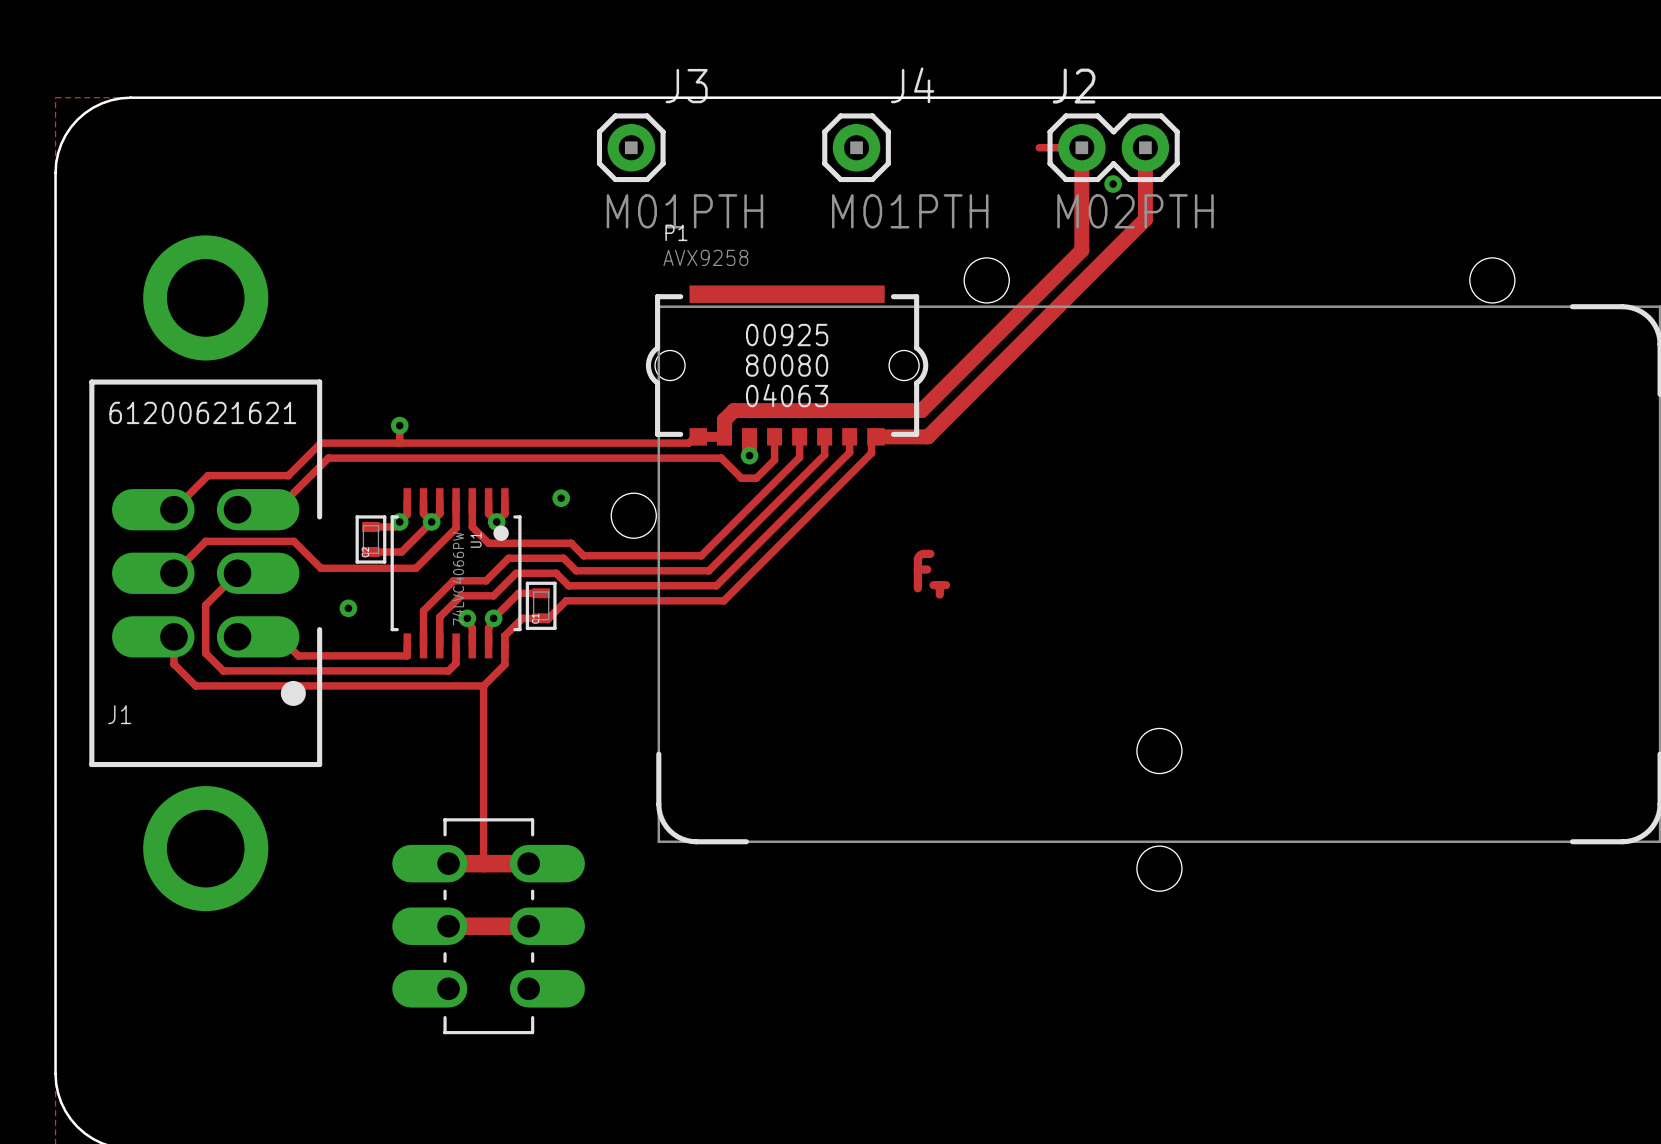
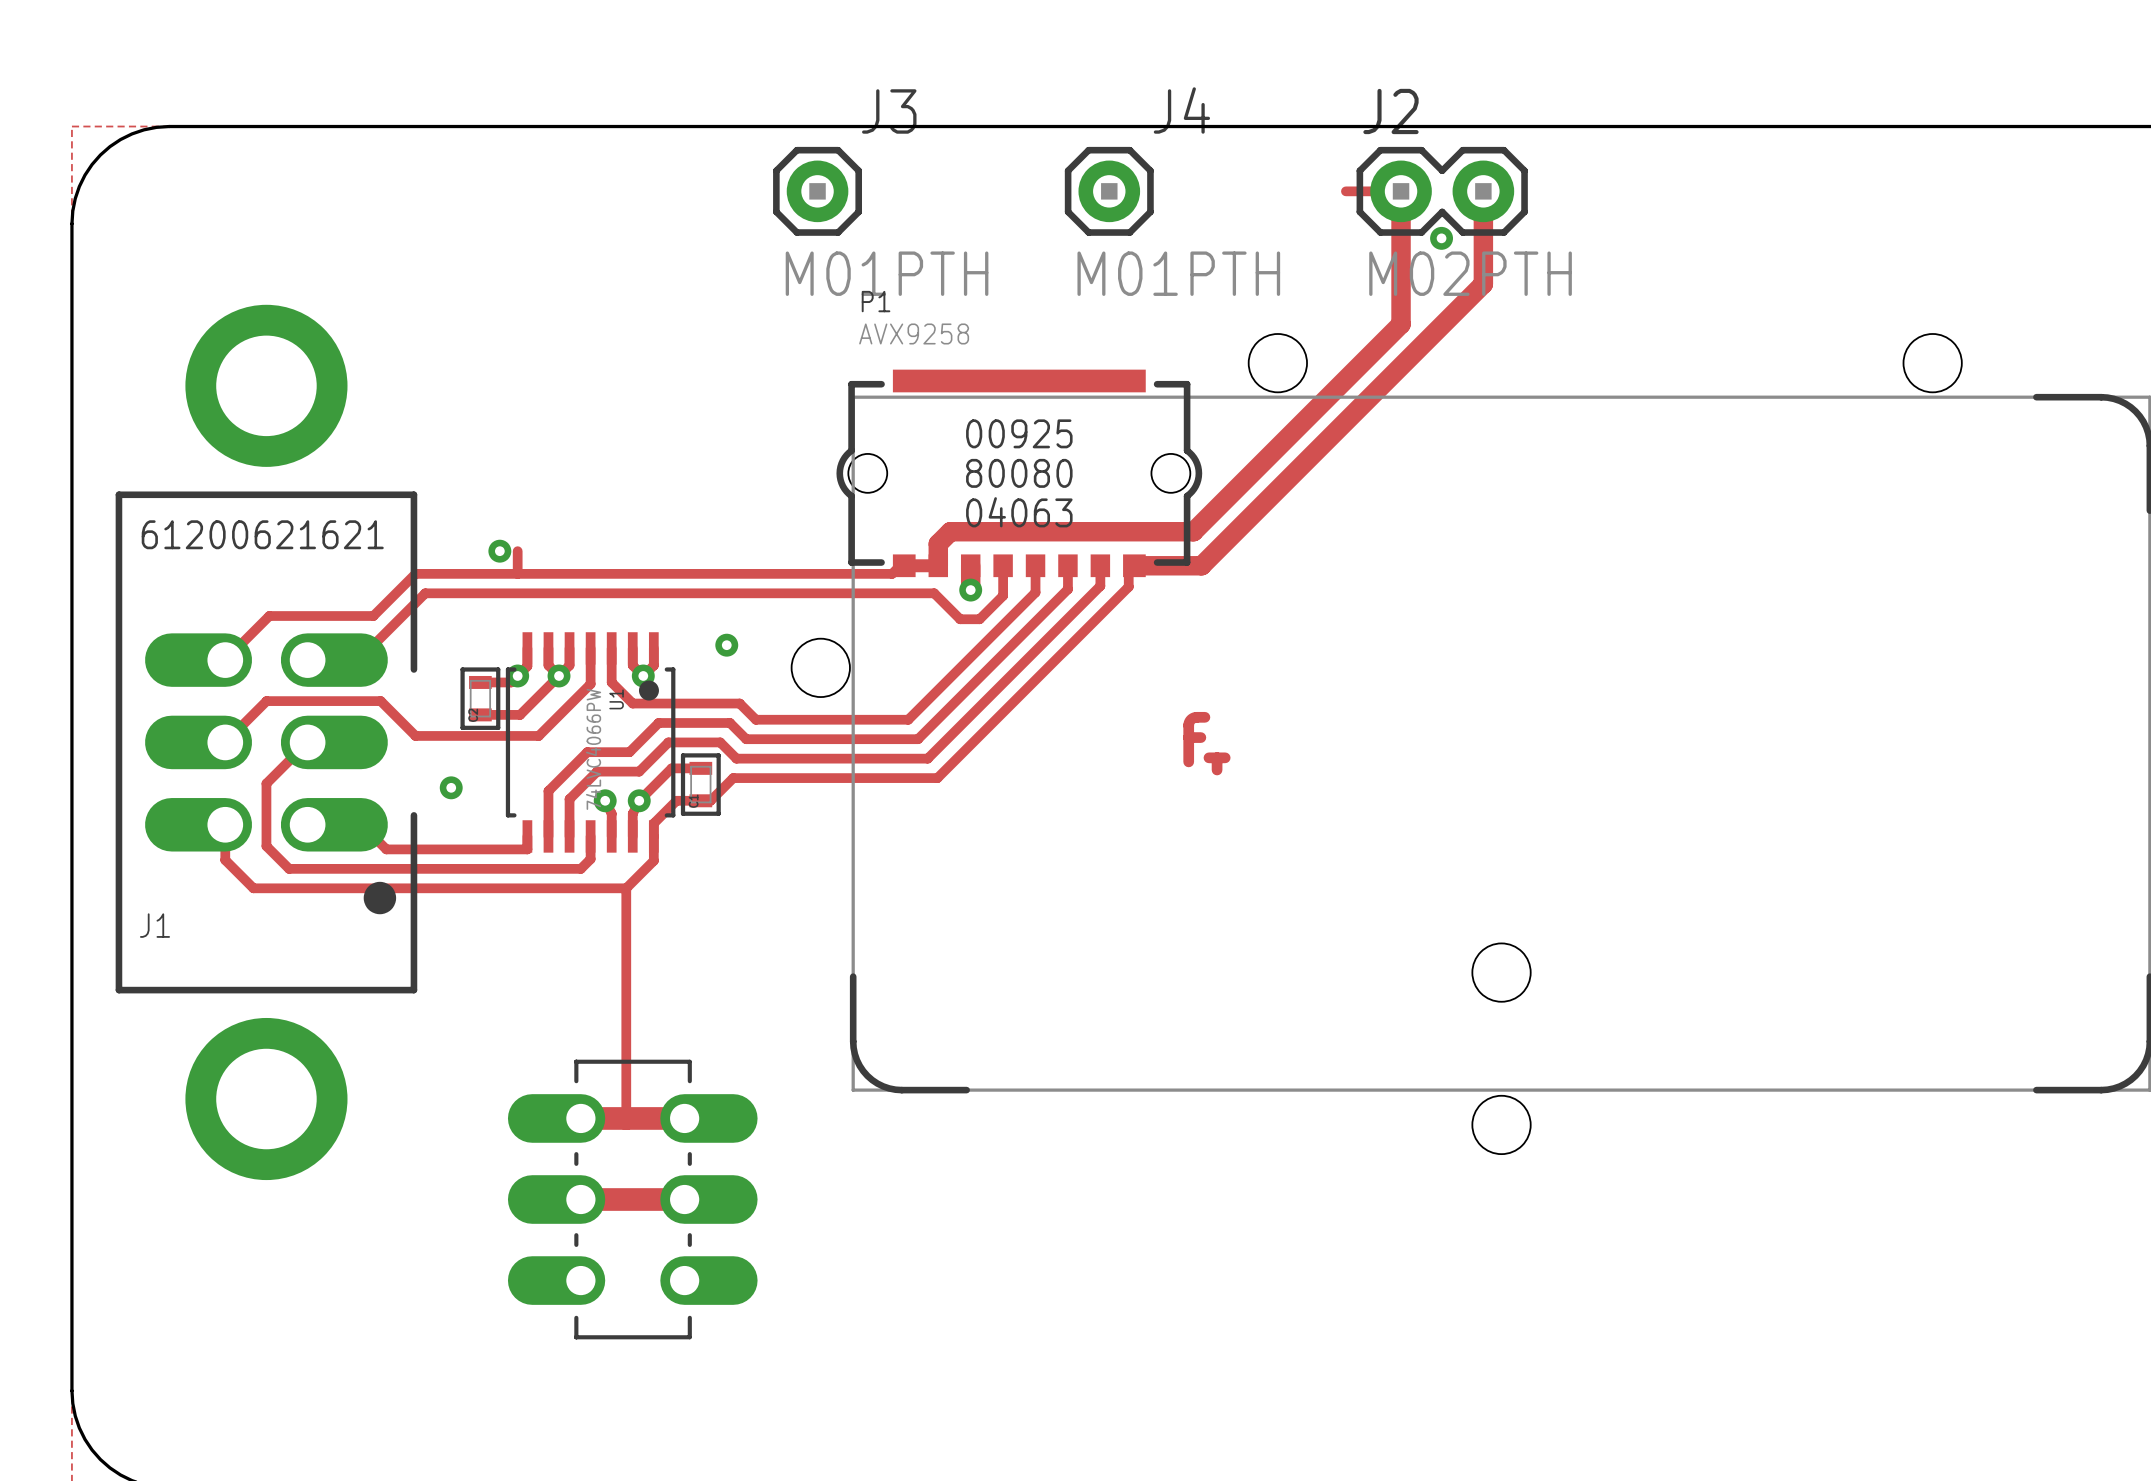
via position: (399, 425) -> (499, 551)

